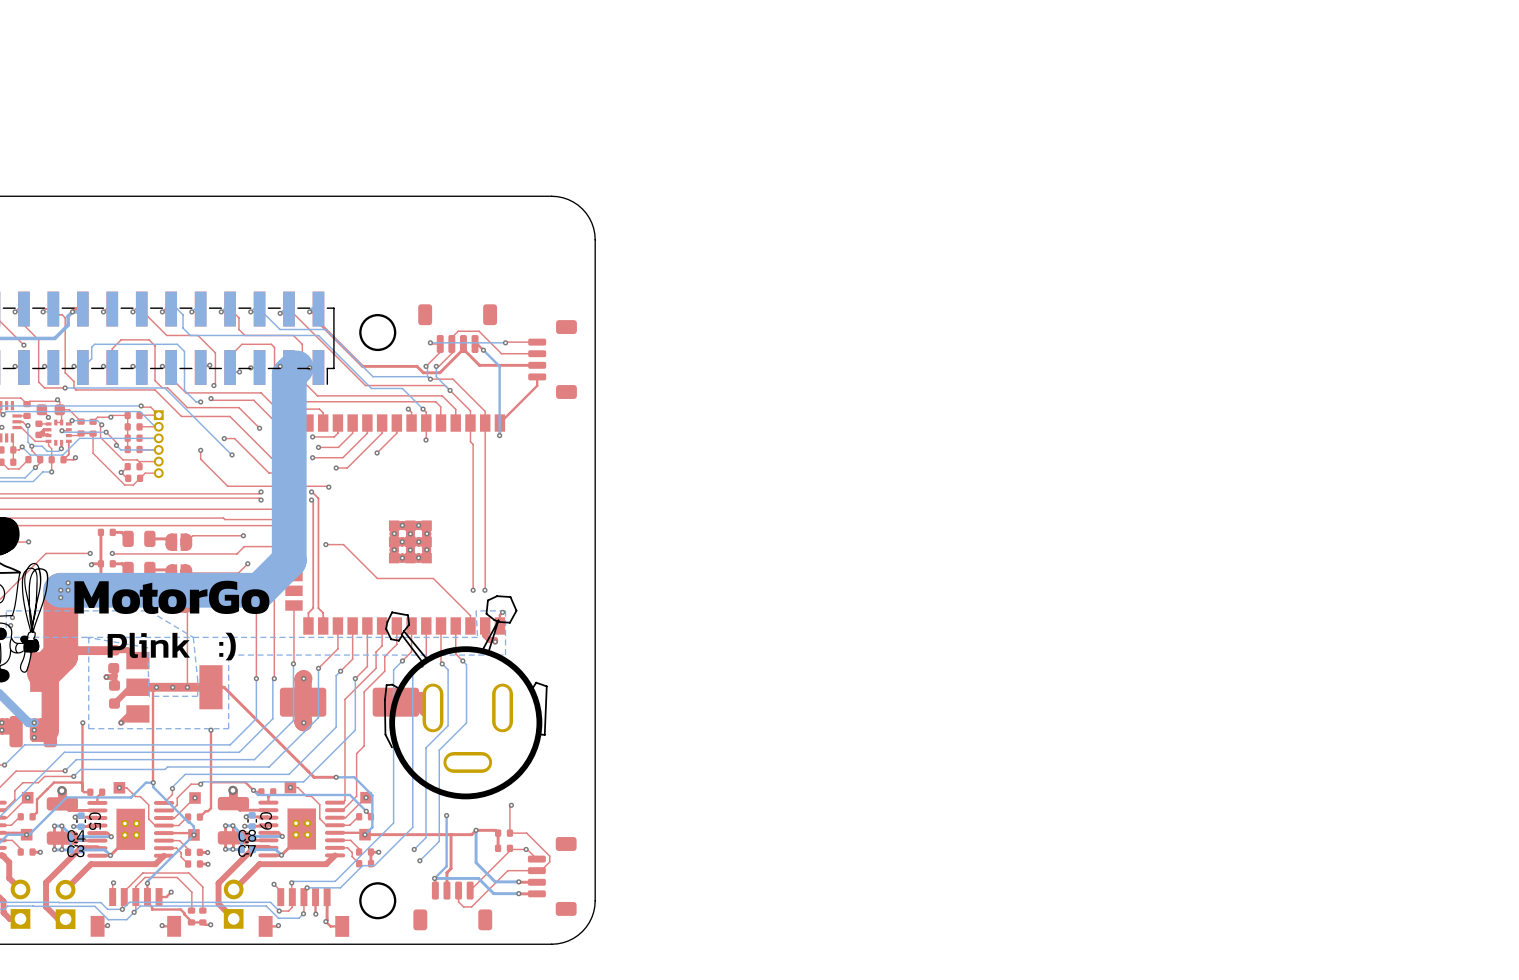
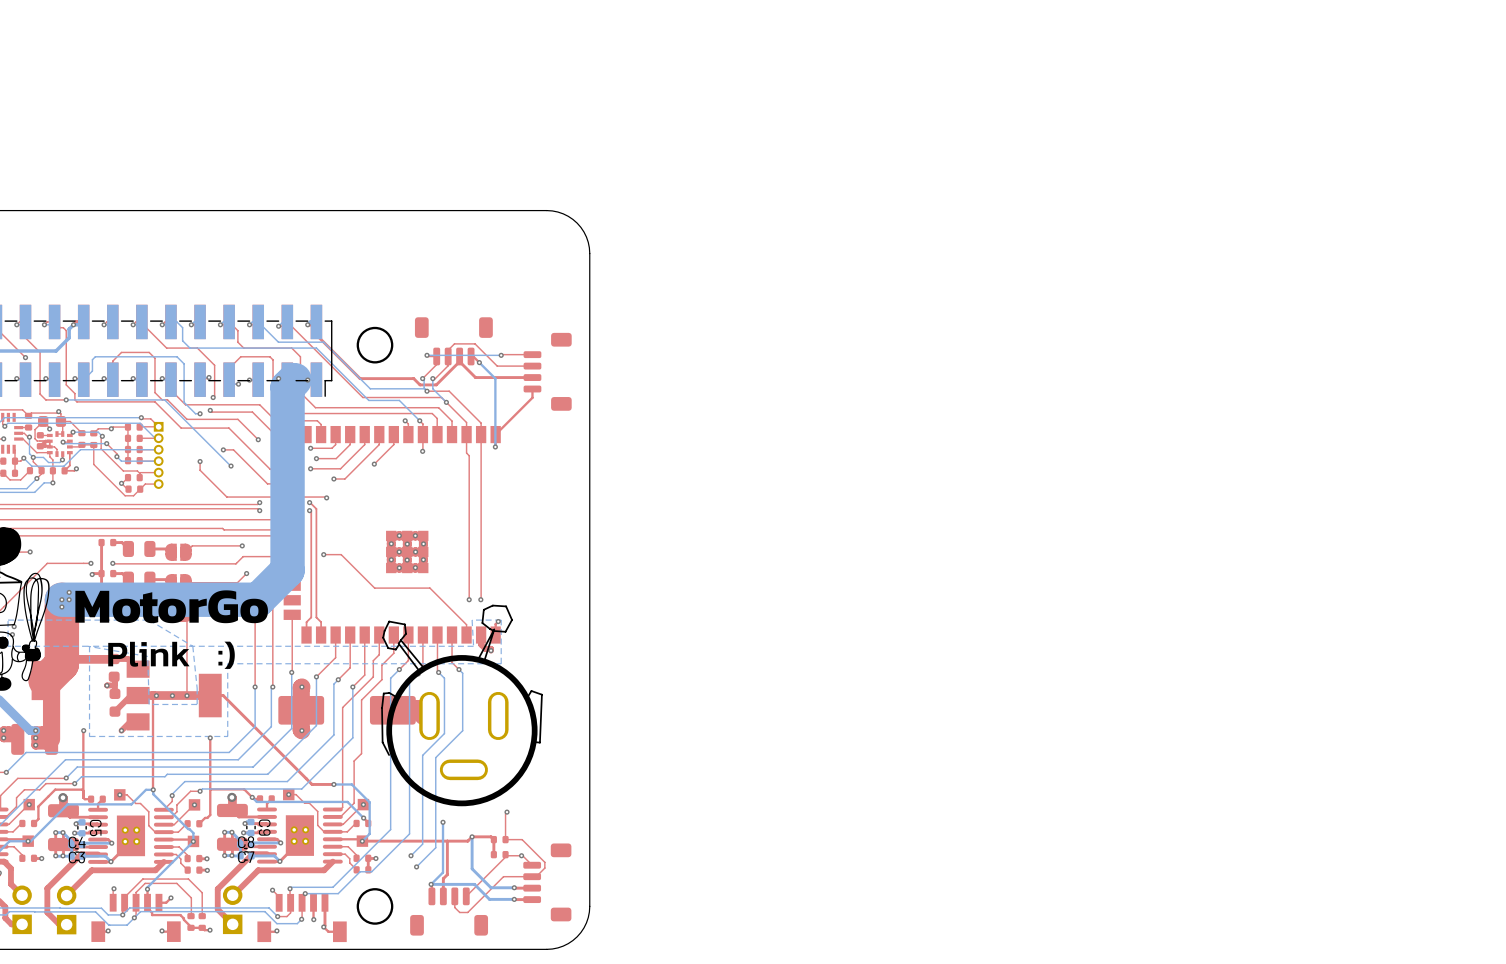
top track: none -> (43, 421) (35, 429) (35, 438) (37, 441) (49, 441) (49, 446) (54, 446) (56, 449) (56, 454)

